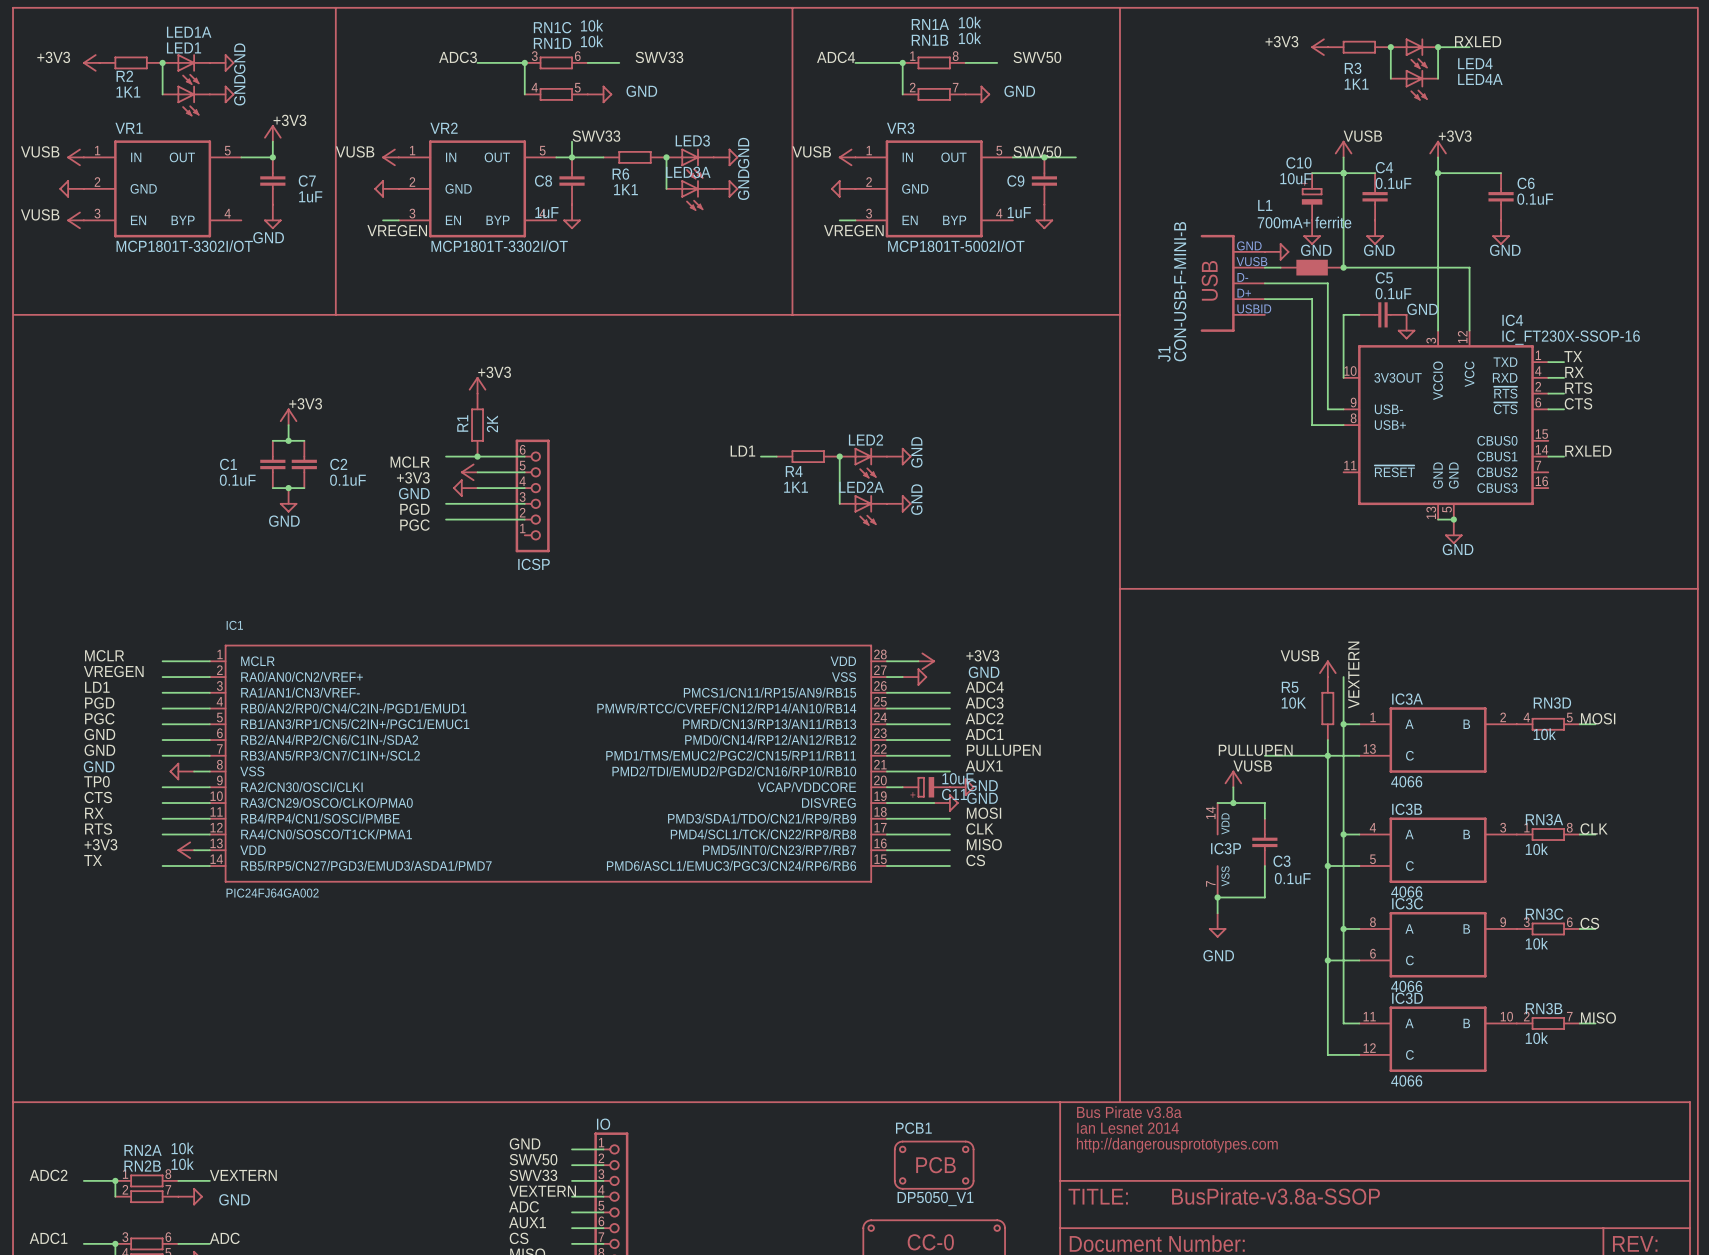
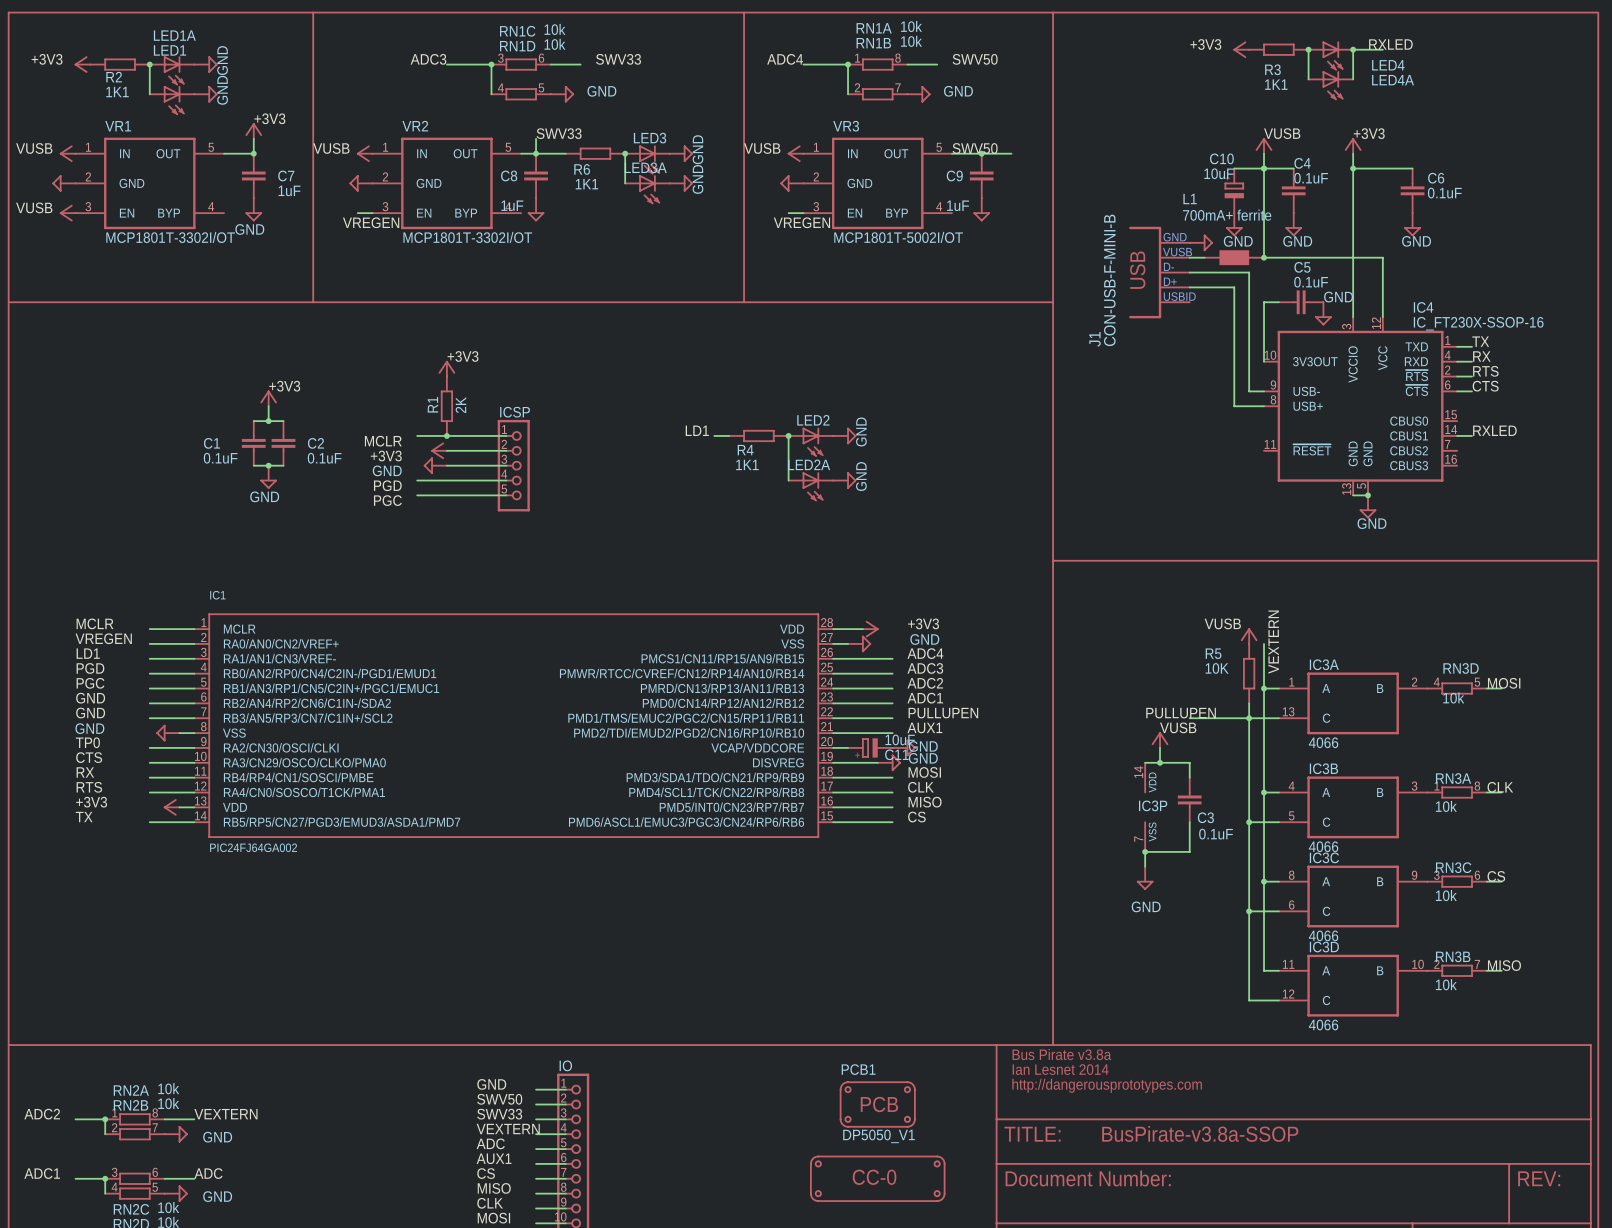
ICSP: none -> (513, 465)
ICSP: (532, 495) -> none

